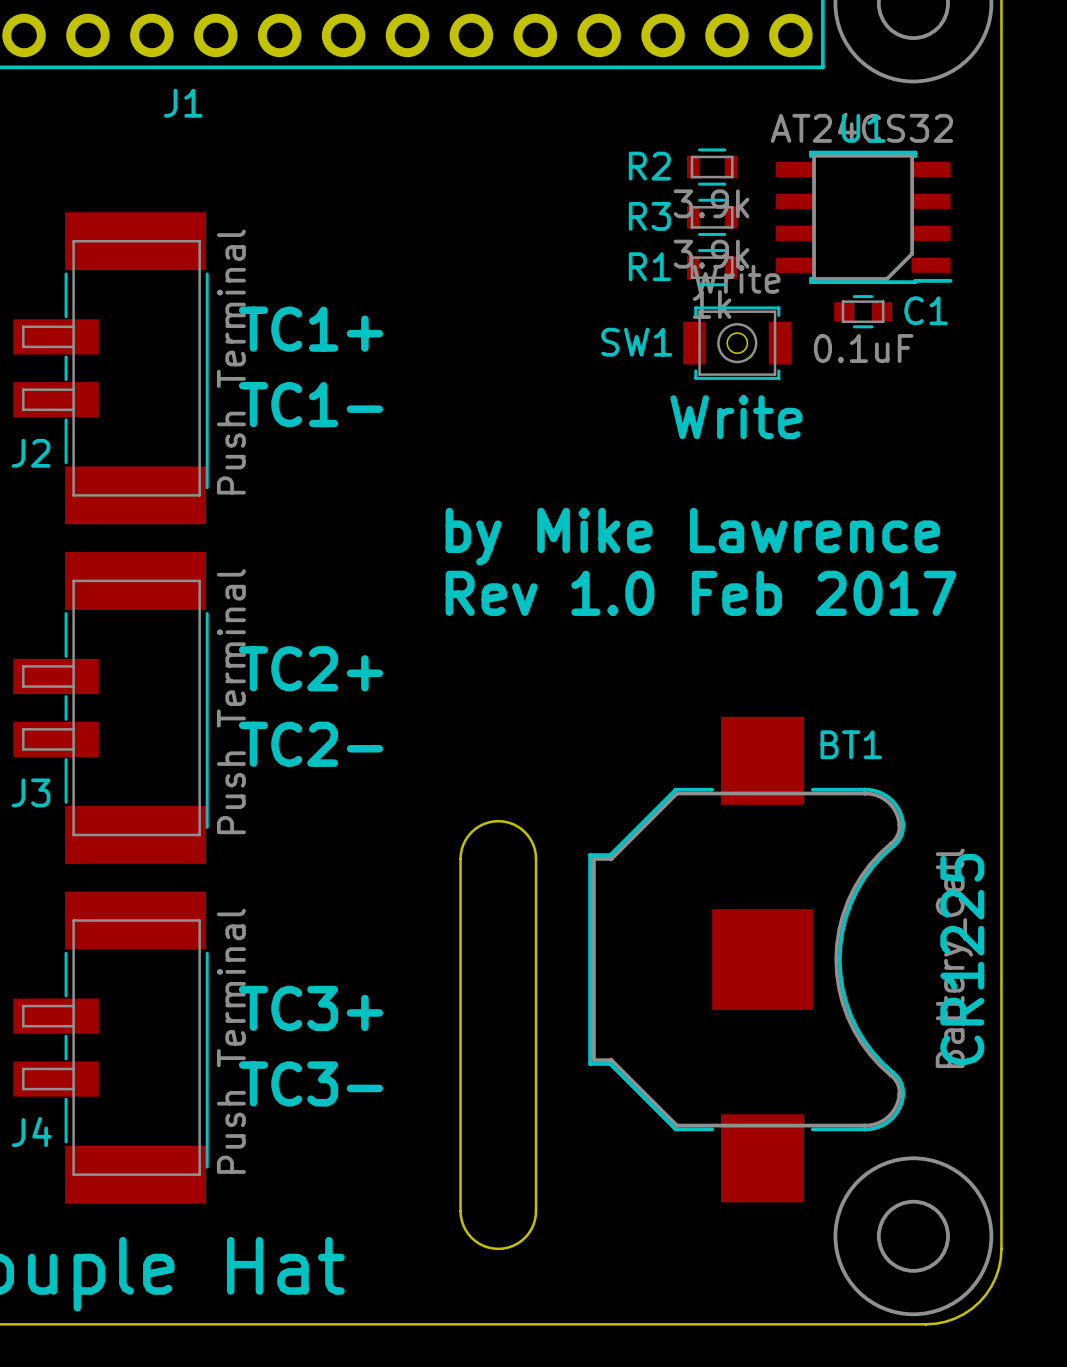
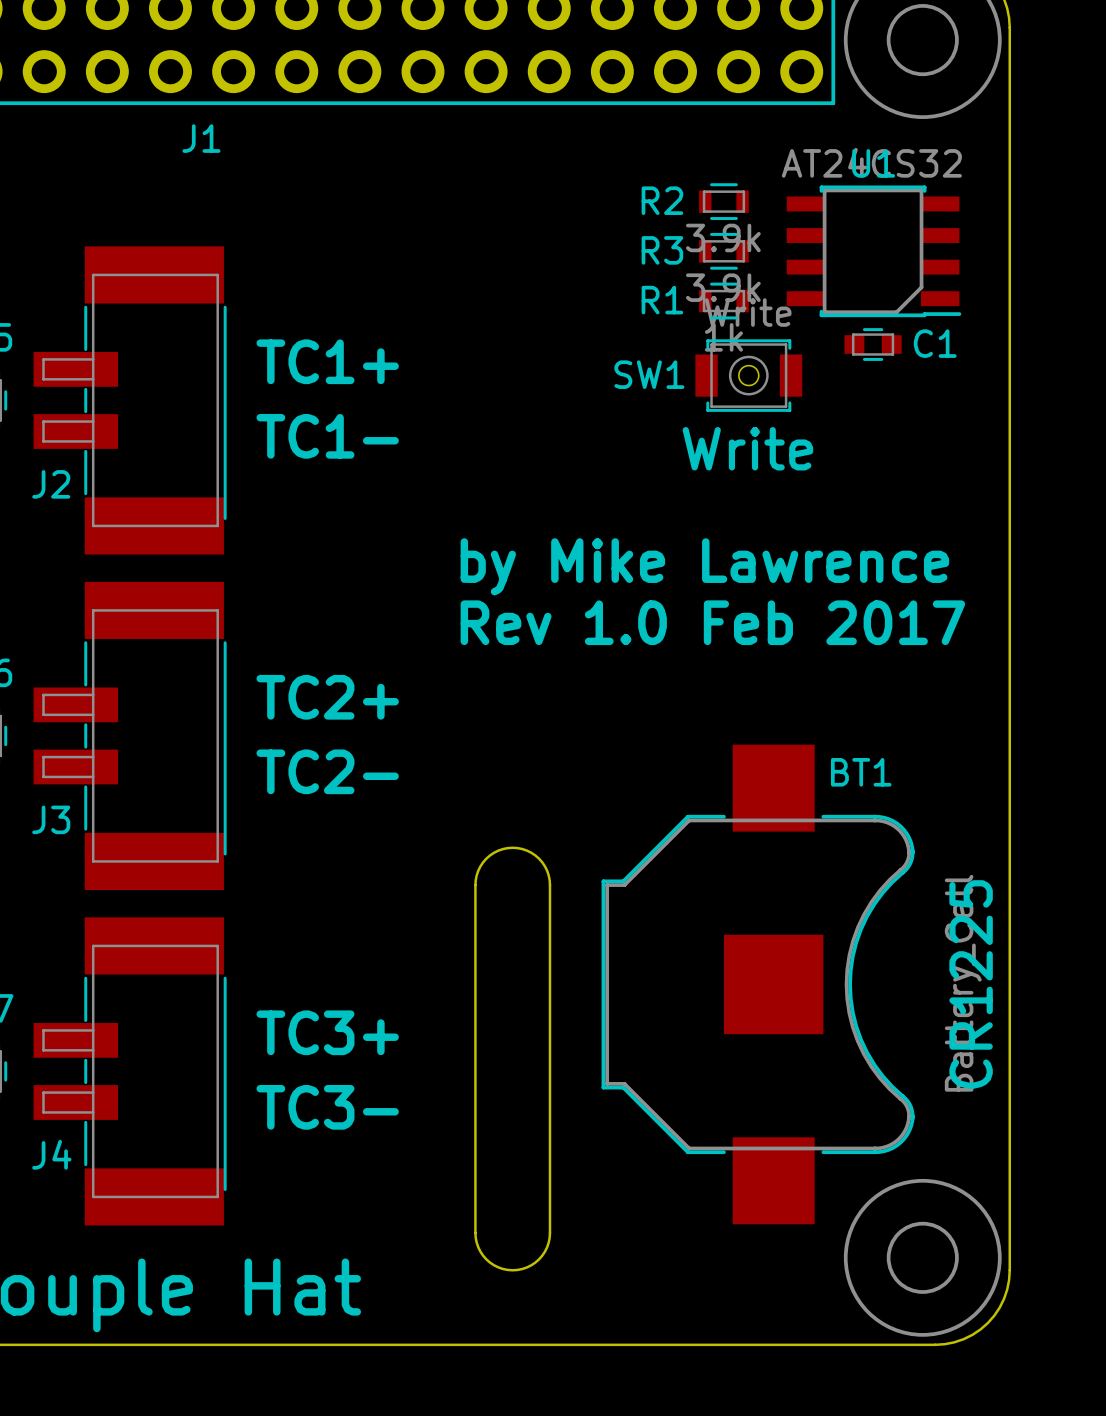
C1 value: 0.1uF (863, 348) -> none
J2 value: Push Terminal (231, 362) -> none
J3 value: Push Terminal (231, 701) -> none
J4 value: Push Terminal (231, 1041) -> none

